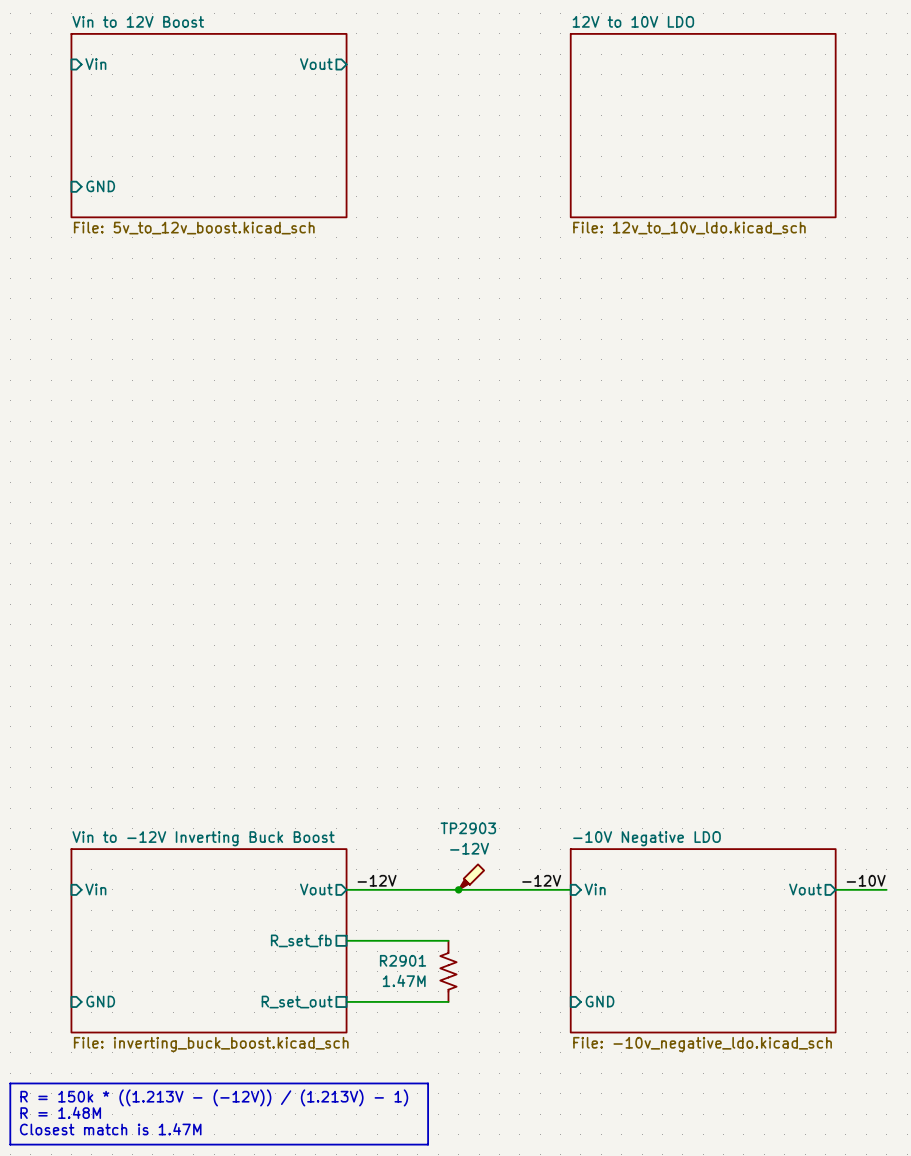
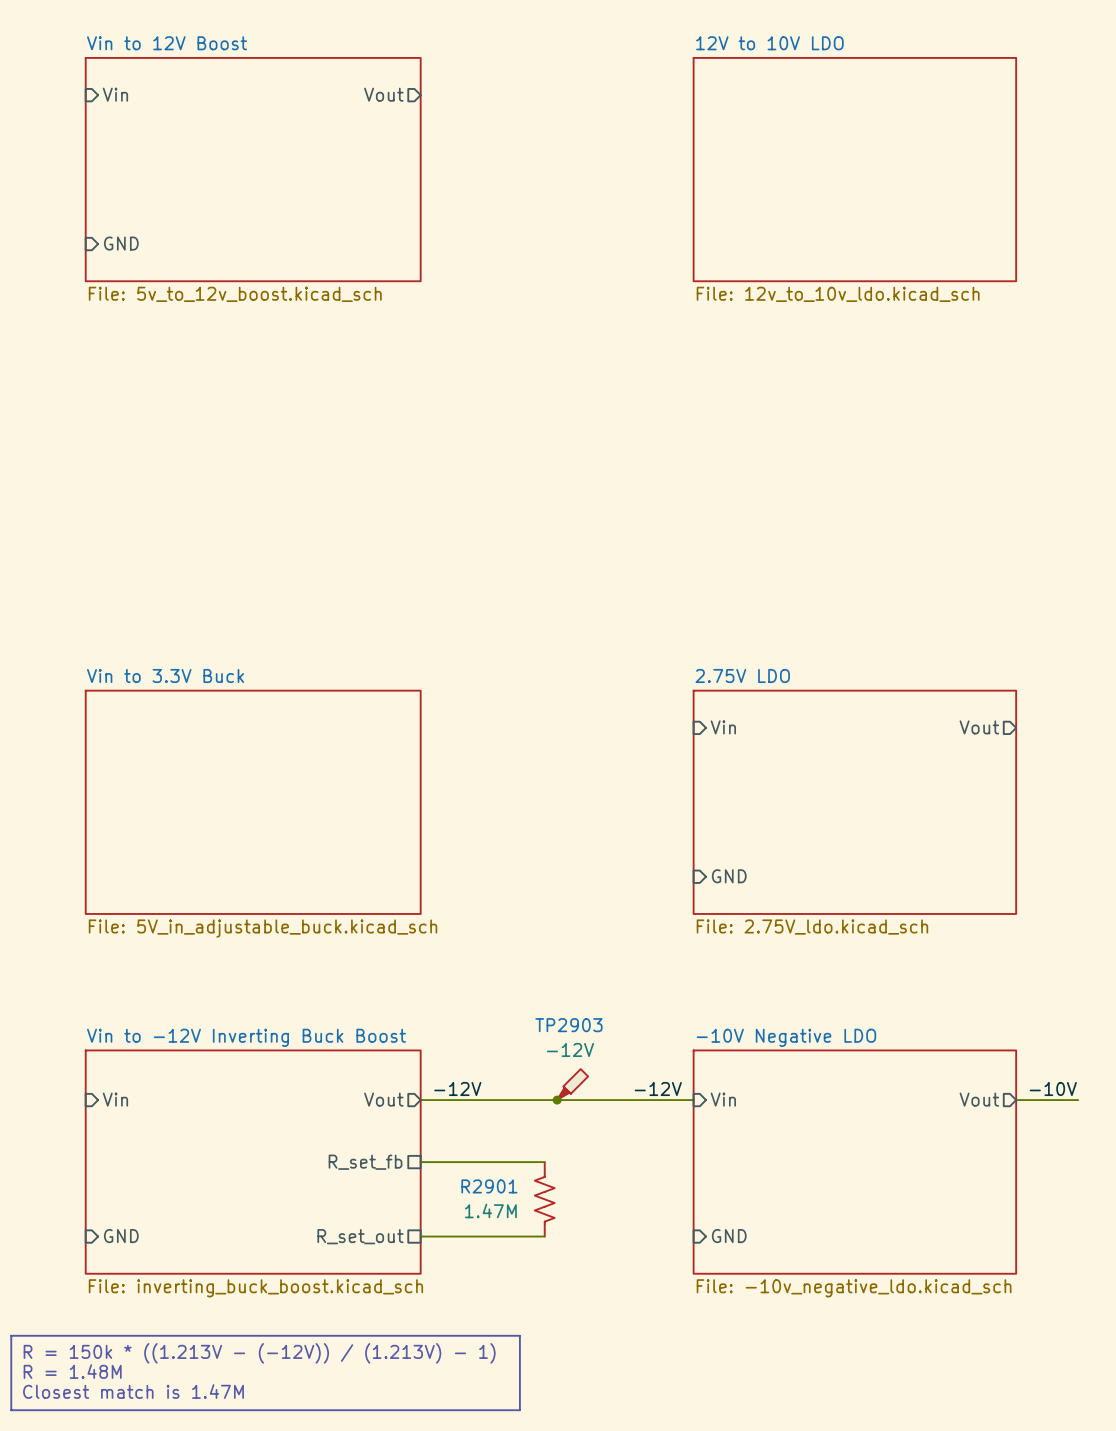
sheet pin: none -> Vin (723, 727)
sheet pin: none -> Vout (979, 727)
sheet Vin to 3.3V Buck: none -> File: 5V_in_adjustable_buck.kicad_sch (253, 802)
sheet 2.75V LDO: none -> File: 2.75V_ldo.kicad_sch (854, 802)
sheet pin: none -> GND (729, 876)

